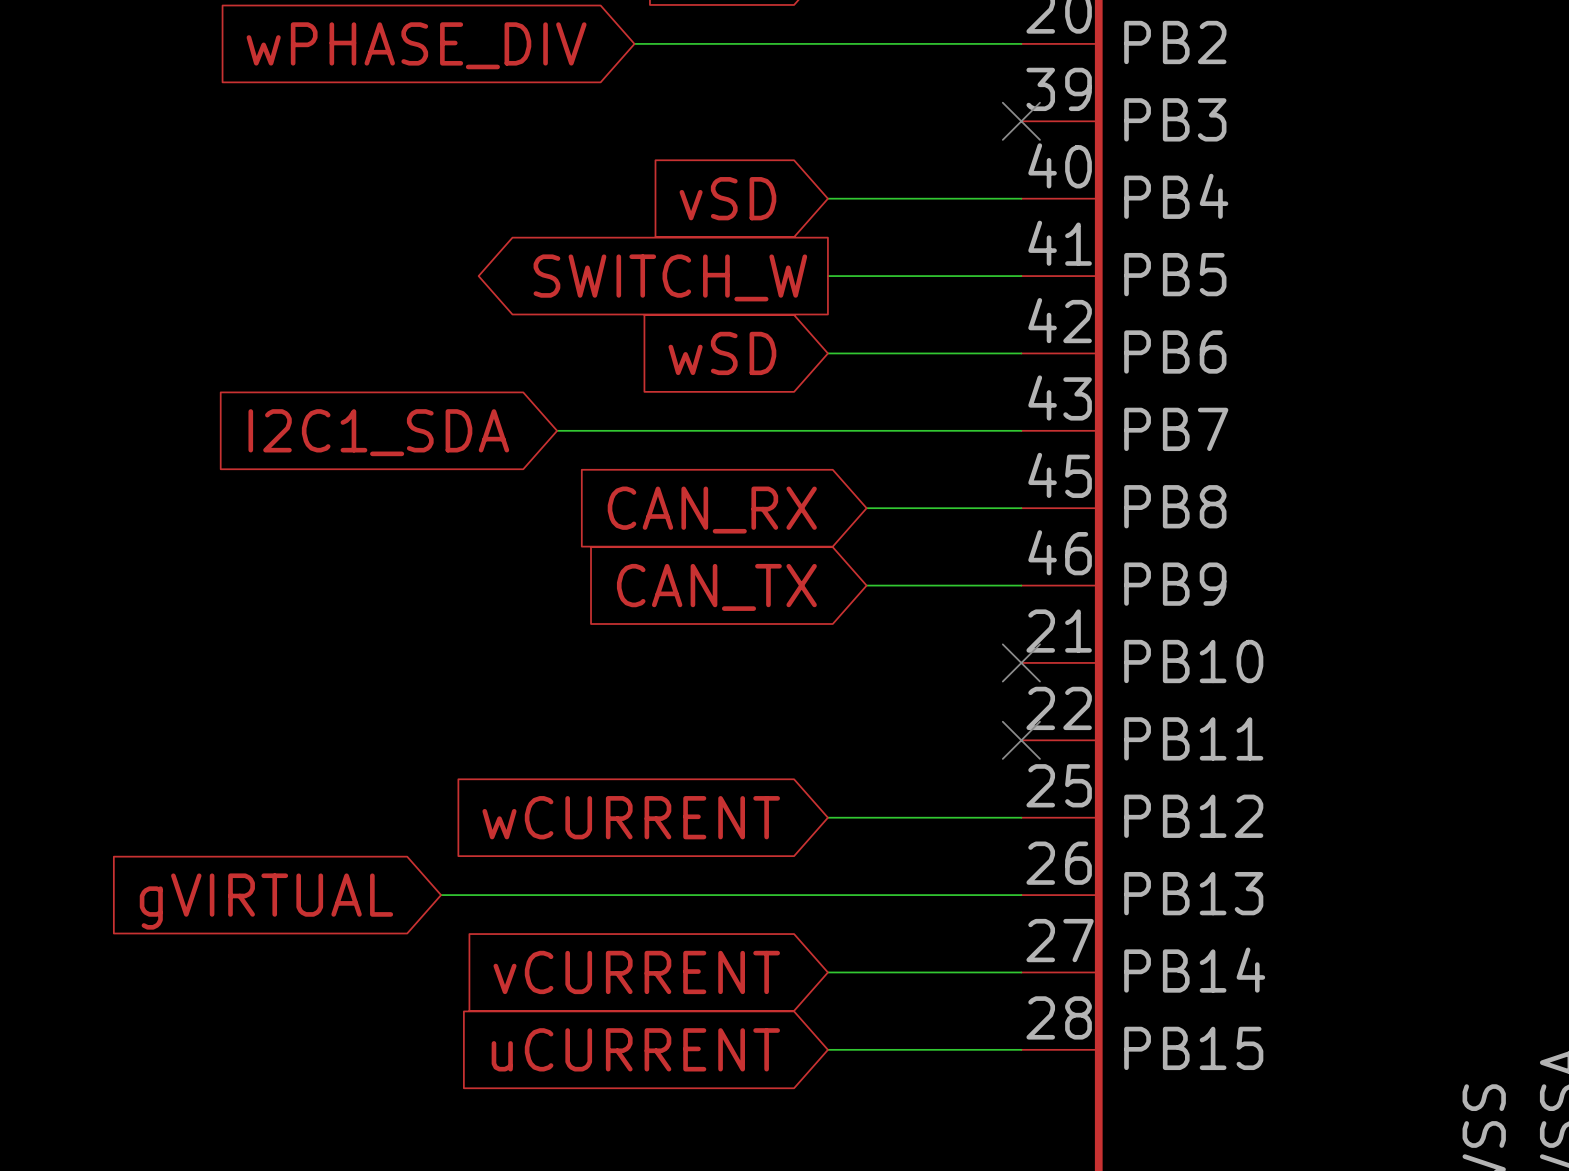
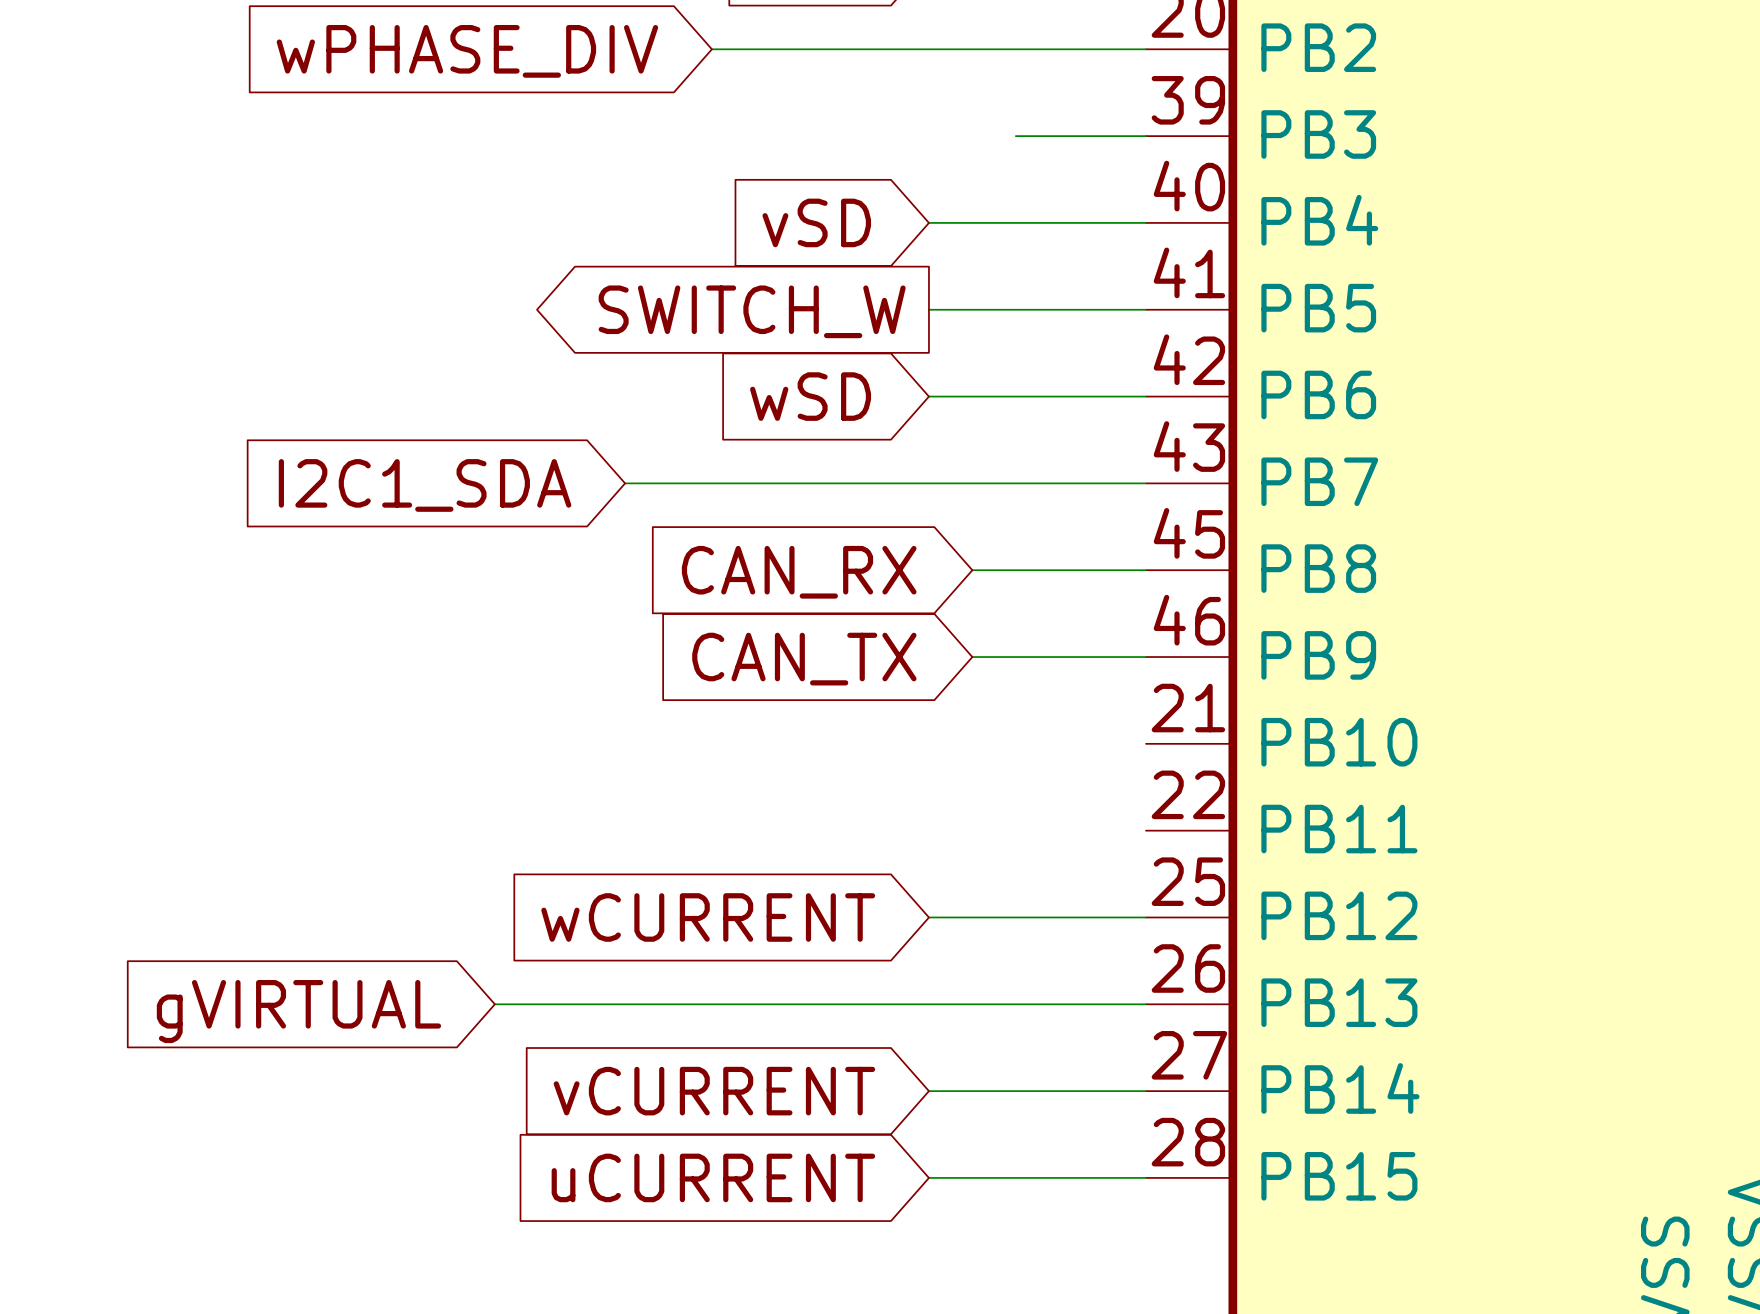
wire: none -> (1015, 136) (1146, 136)
no-connect mark: (1021, 121) -> none
no-connect mark: (1021, 662) -> none
no-connect mark: (1021, 740) -> none

